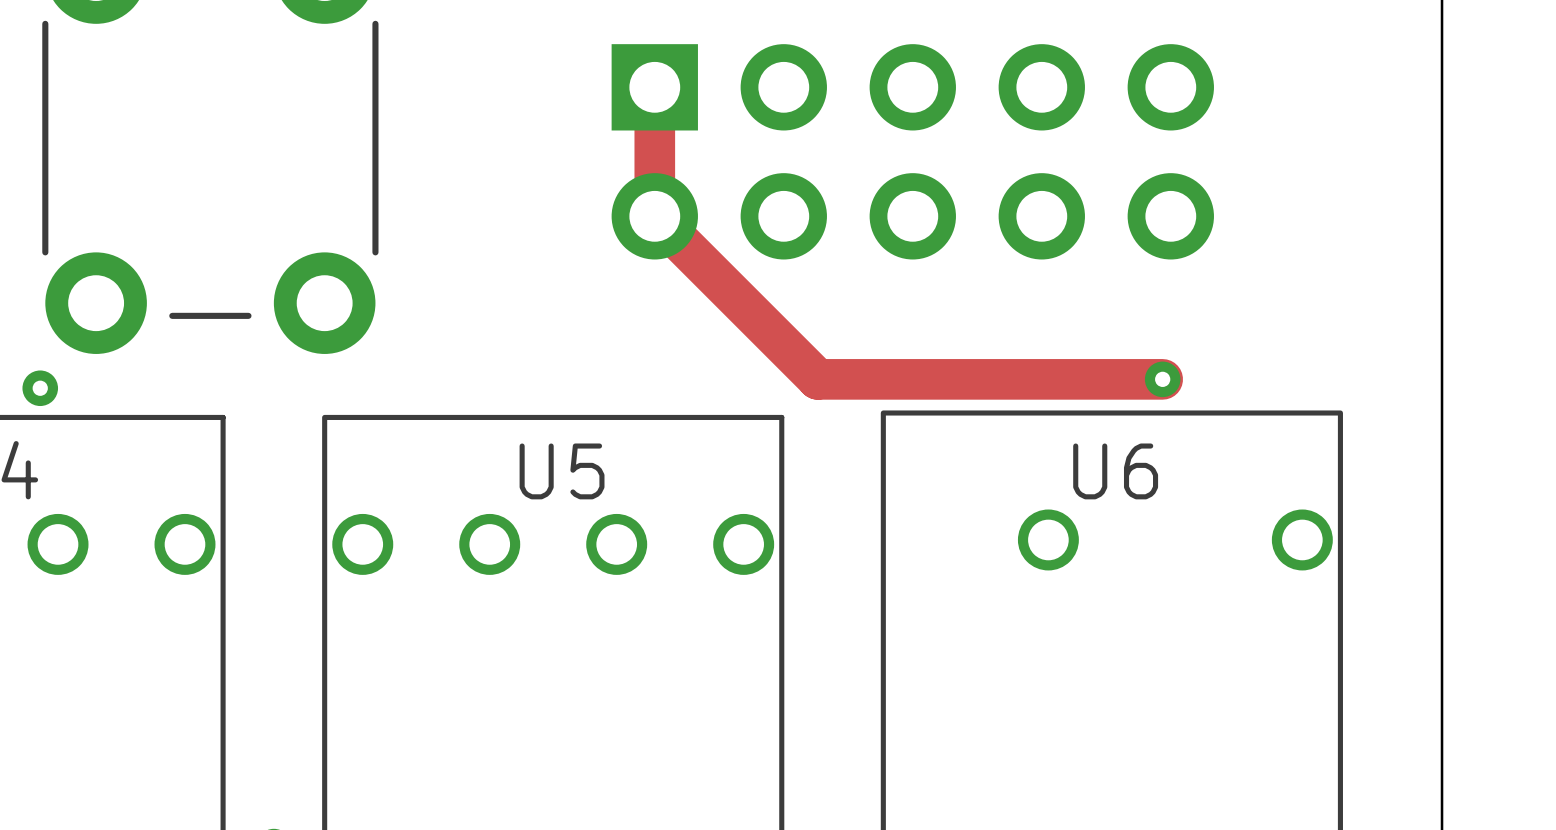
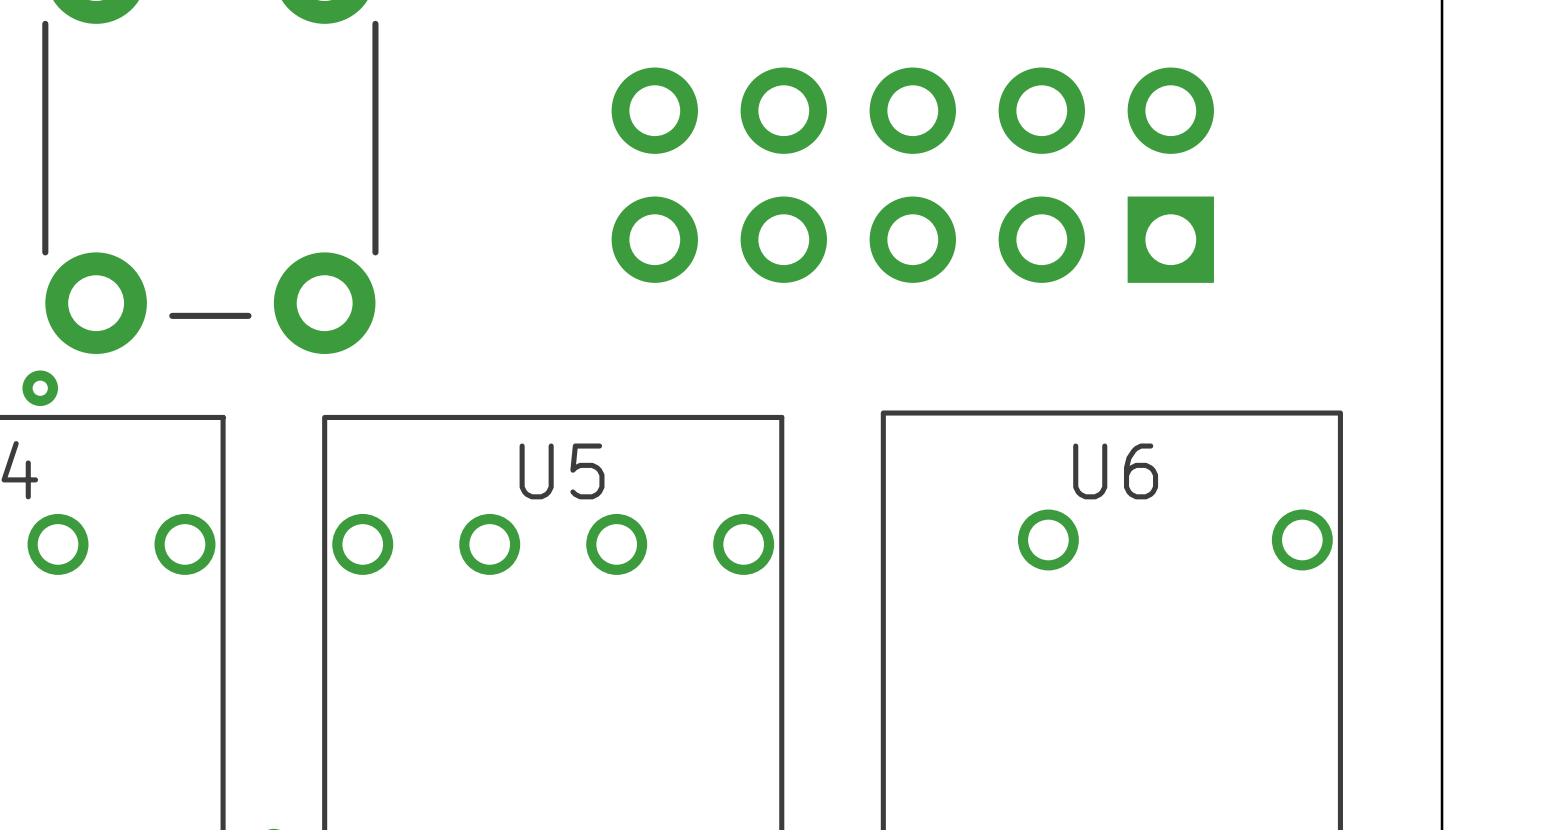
track: (654, 87) (654, 216) (817, 379) (1162, 379) -> none
part rotation: 0° (912, 151) -> 180° (912, 175)
via: (1162, 379) -> none

